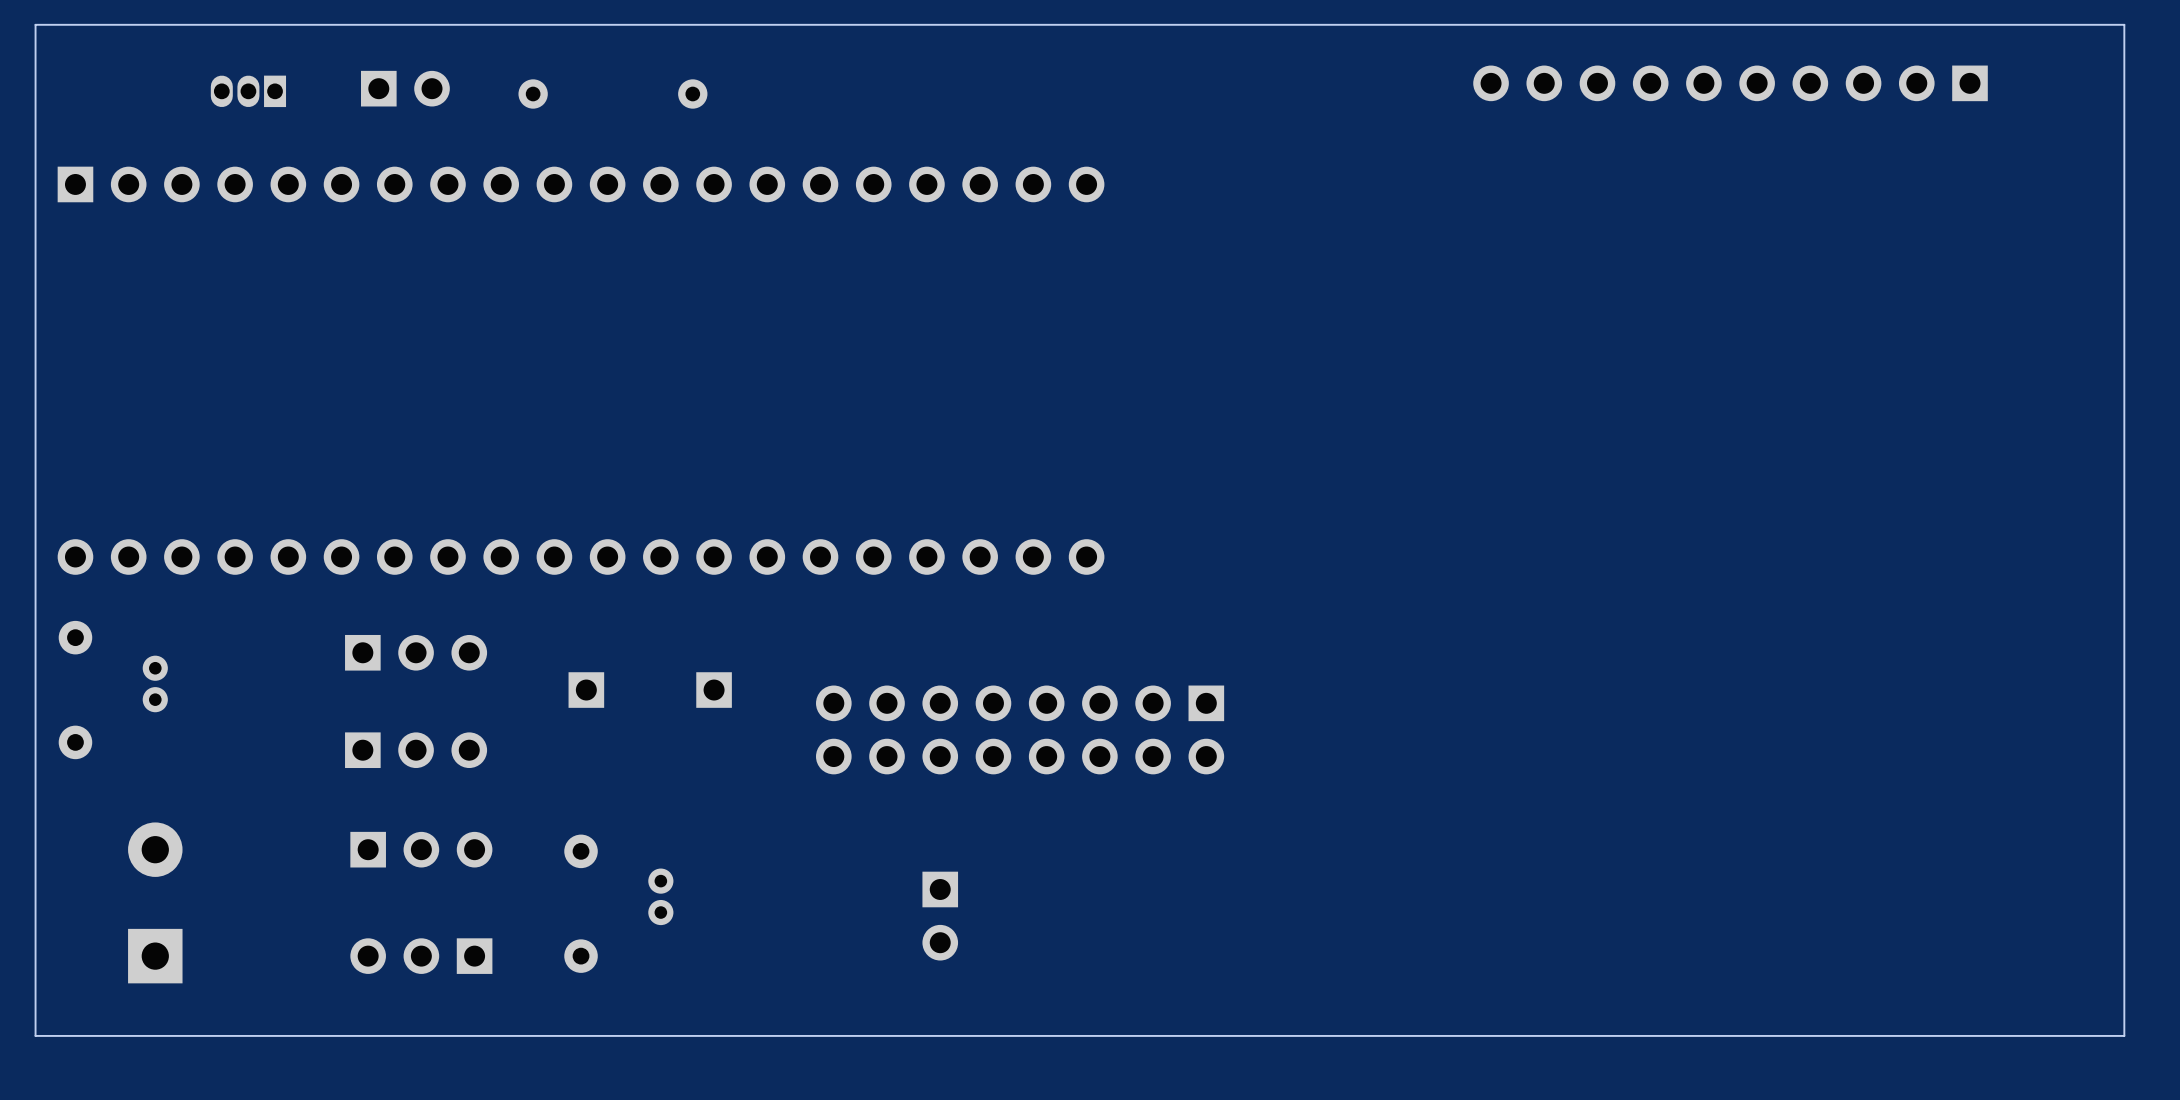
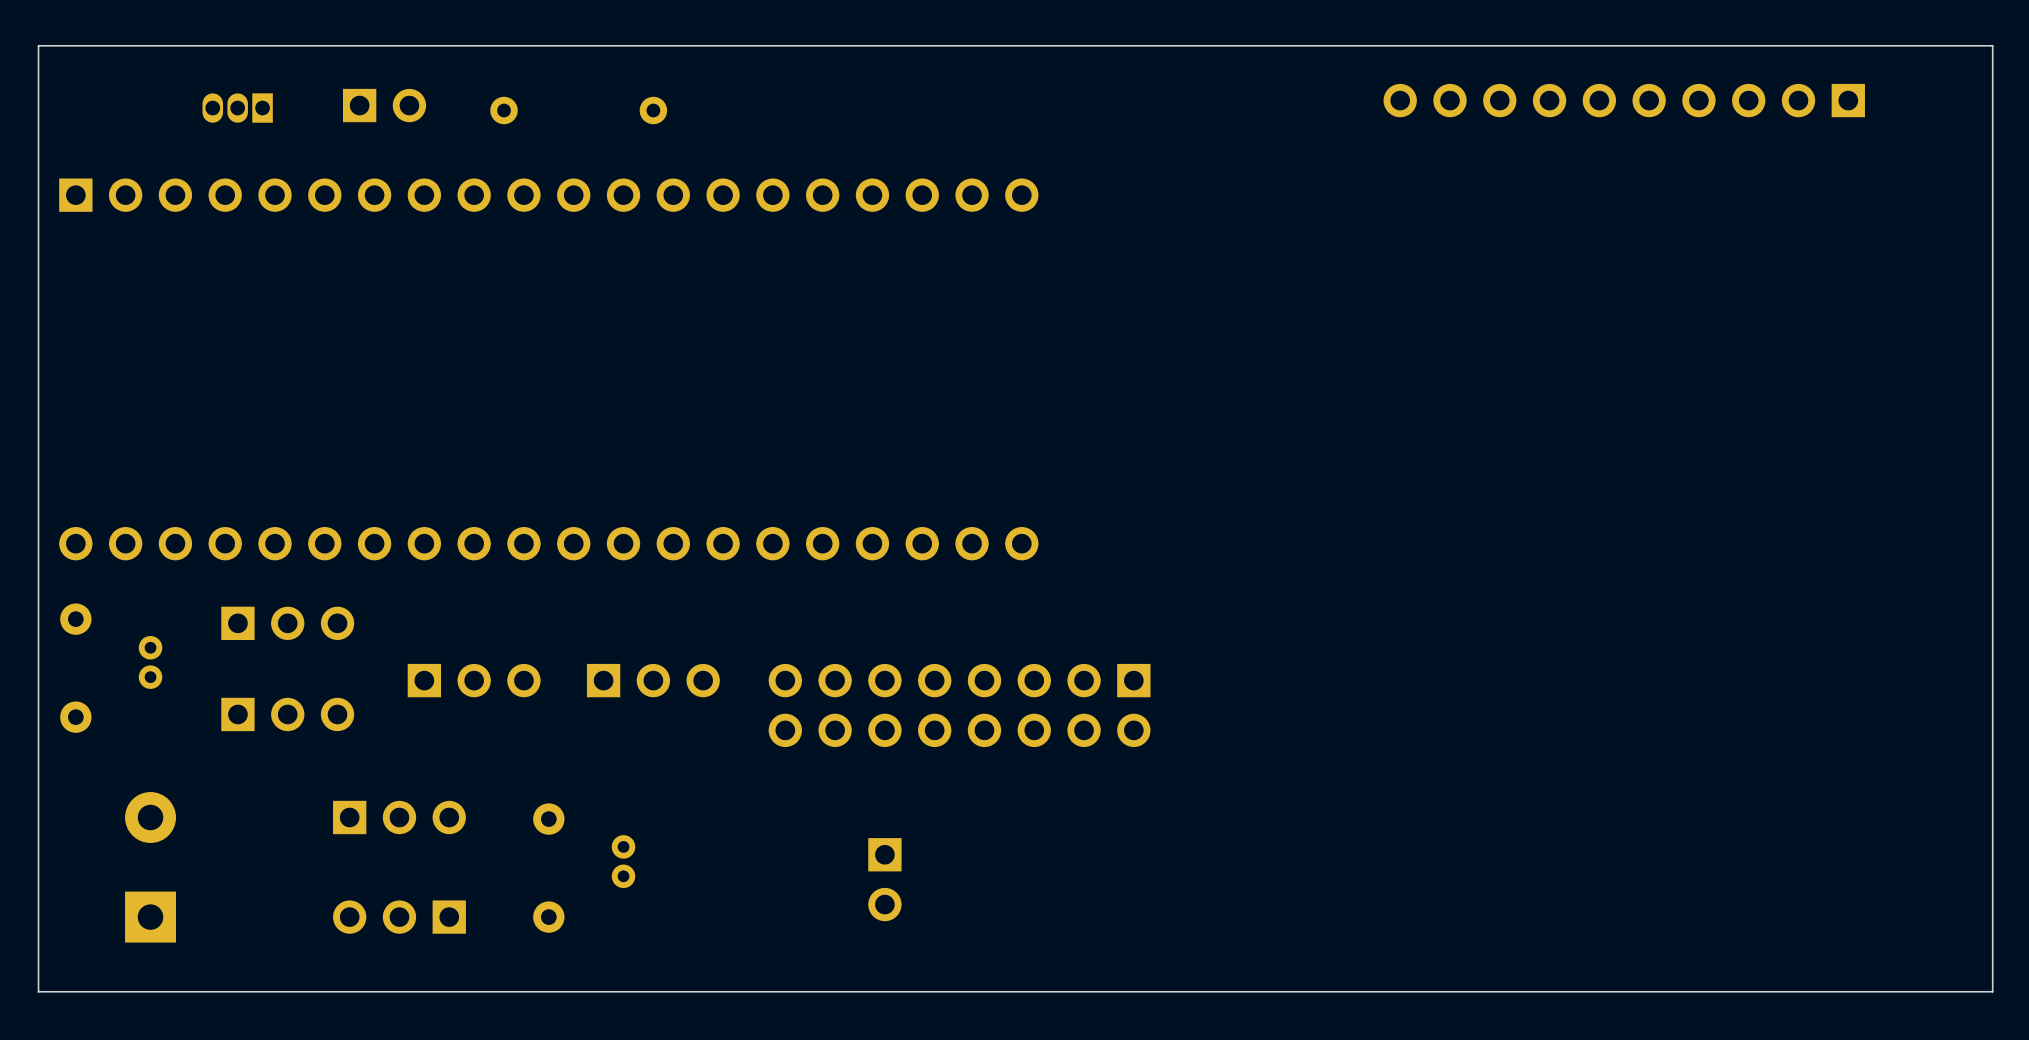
part: none -> (287, 623)
part: (416, 652) -> none
part: (586, 690) -> none
part: (714, 690) -> none
part: none -> (474, 680)
part: none -> (653, 680)
part: none -> (287, 714)
part: (416, 750) -> none

